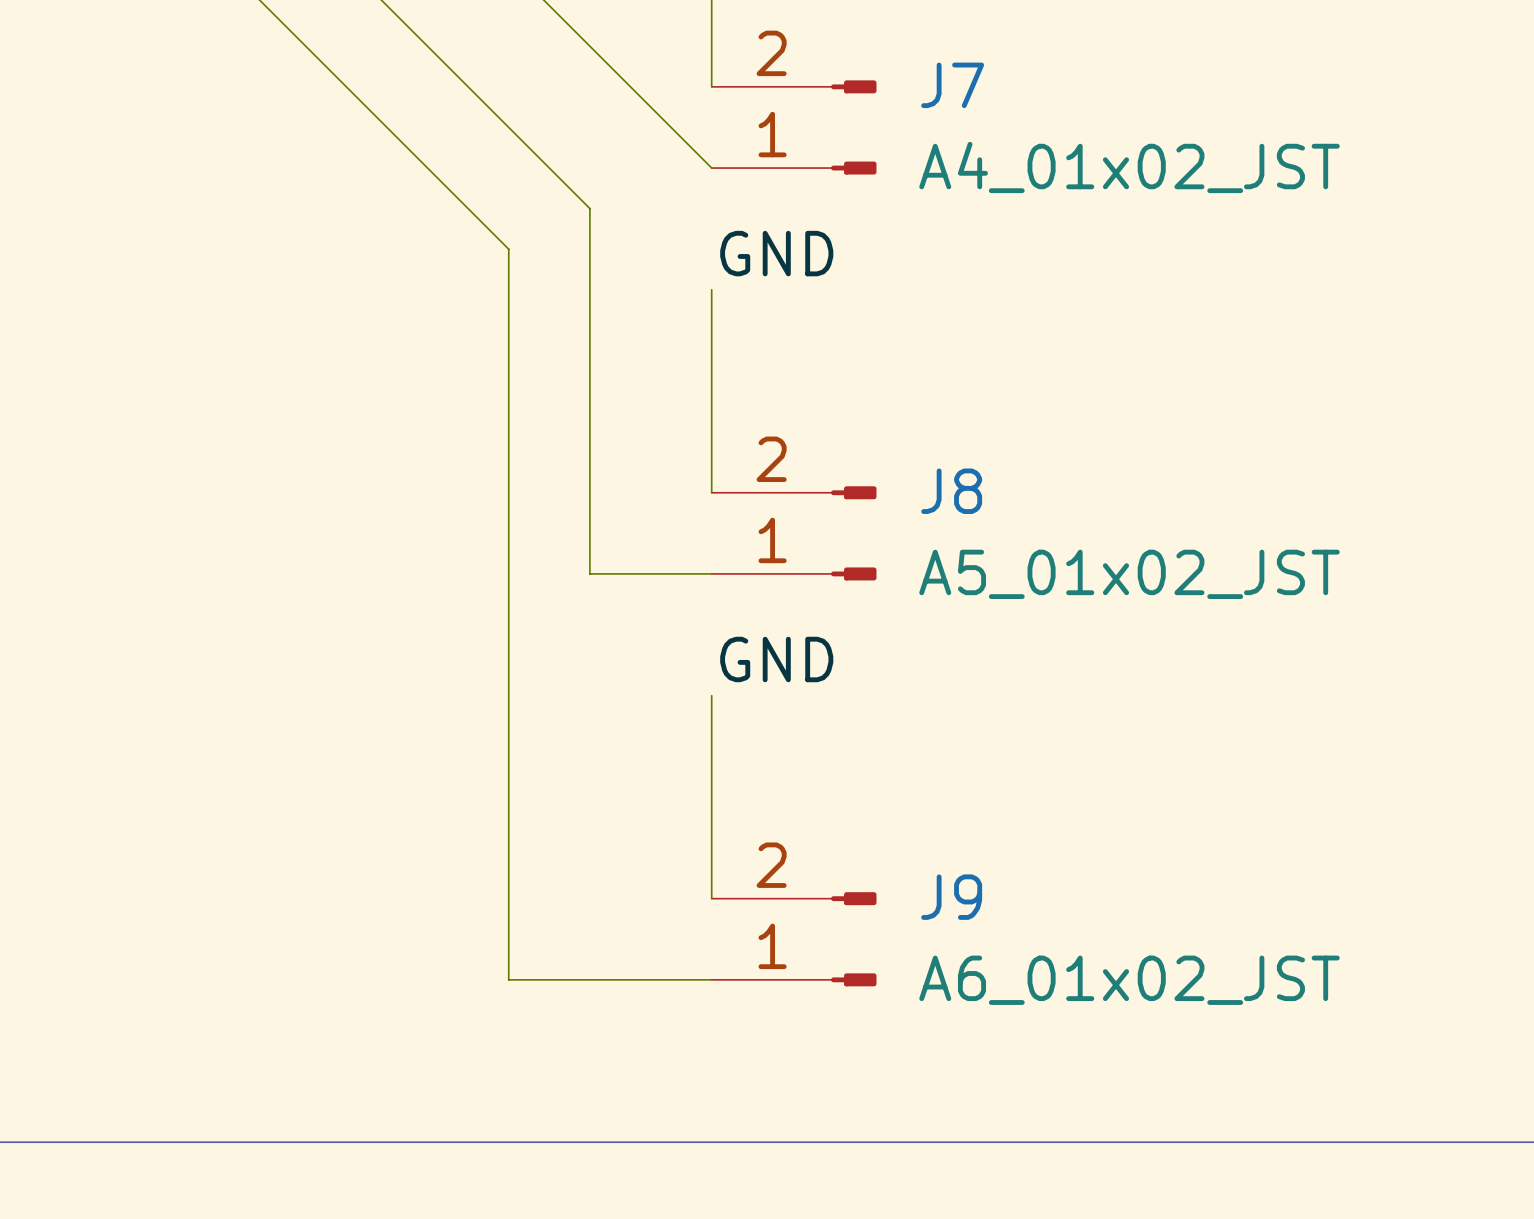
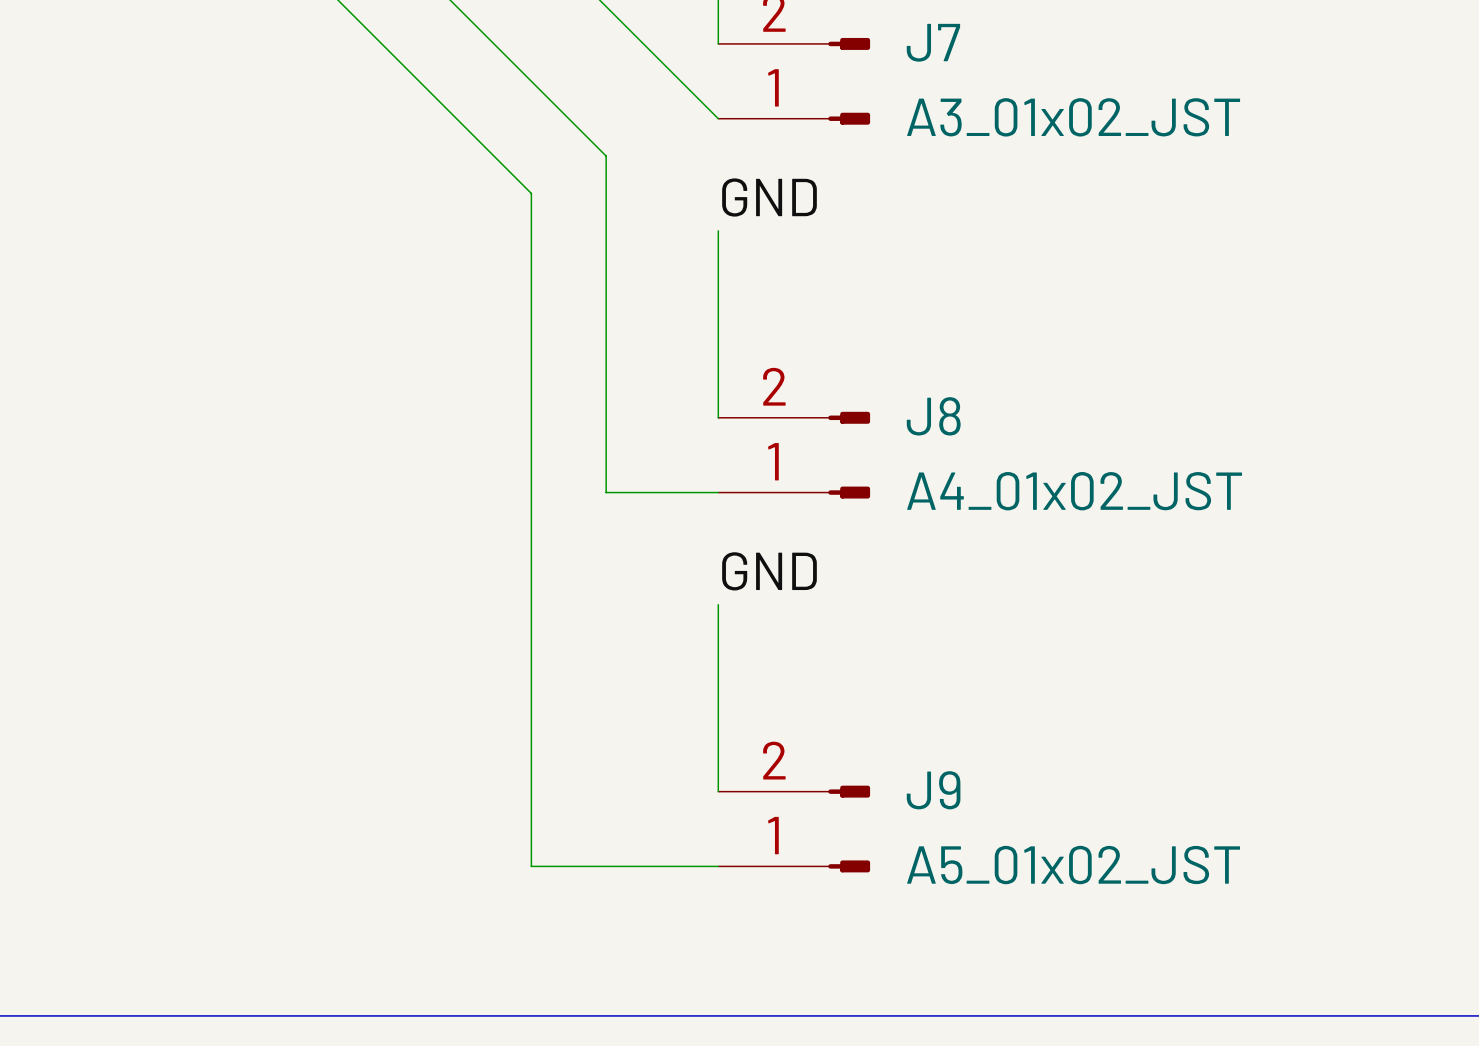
J7 value: A4_01x02_JST (1129, 167) -> A3_01x02_JST (1073, 117)
J8 value: A5_01x02_JST (1129, 574) -> A4_01x02_JST (1074, 491)
J9 value: A6_01x02_JST (1129, 980) -> A5_01x02_JST (1073, 865)

